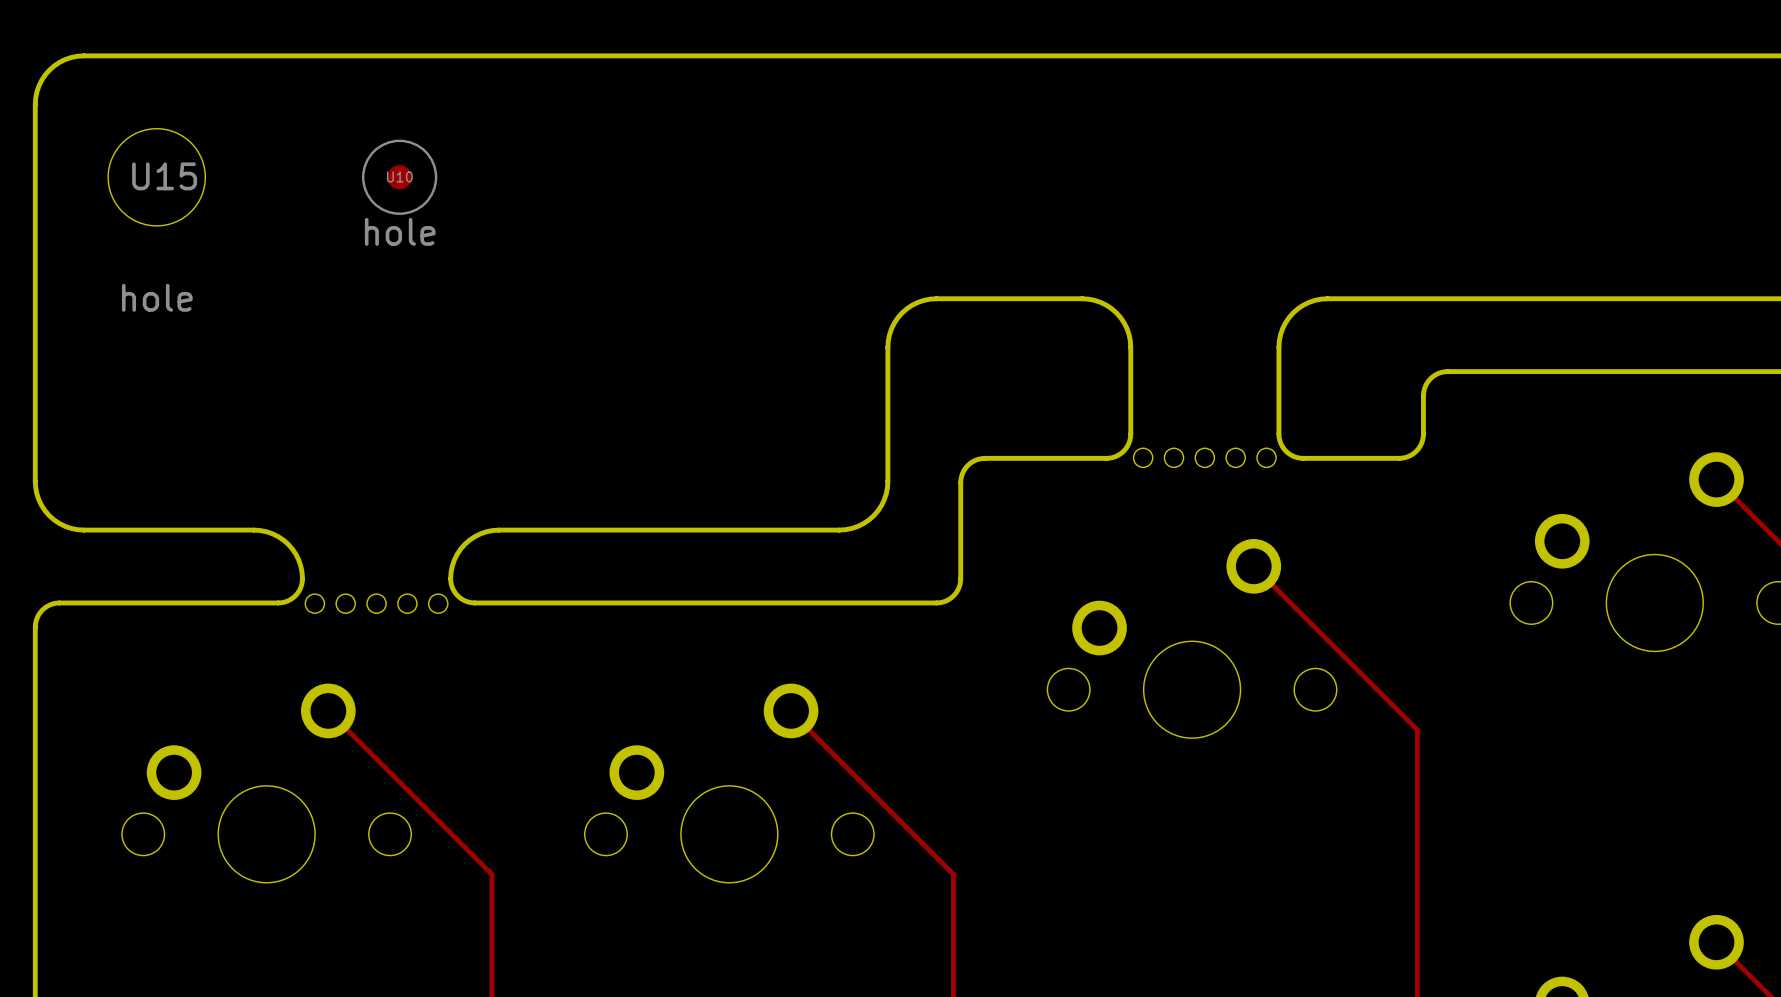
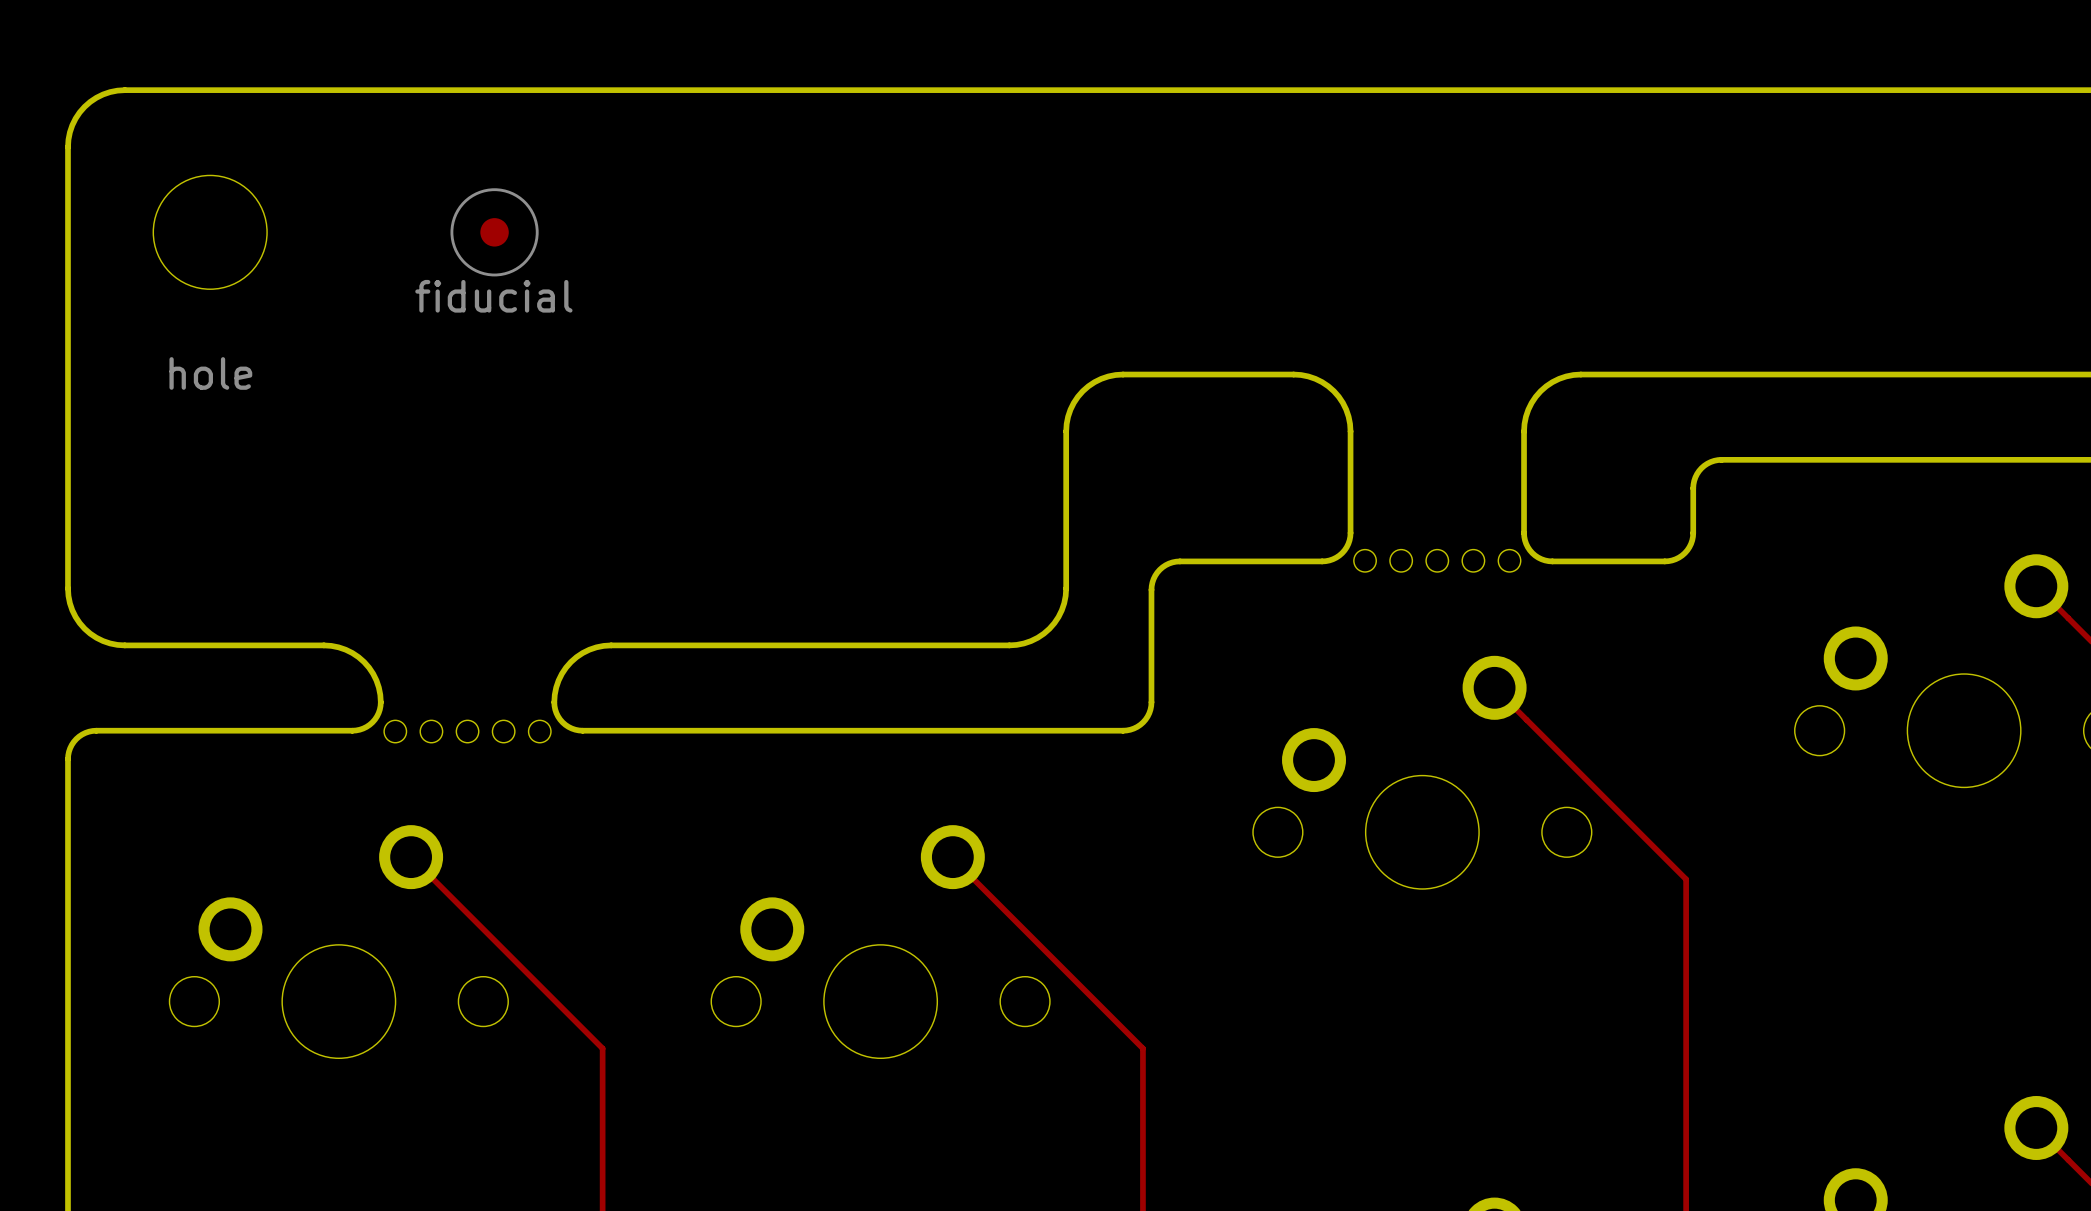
U15 name: U15 (164, 176) -> none
U10 name: U10 (399, 176) -> none
U10 value: hole (400, 231) -> fiducial (493, 296)

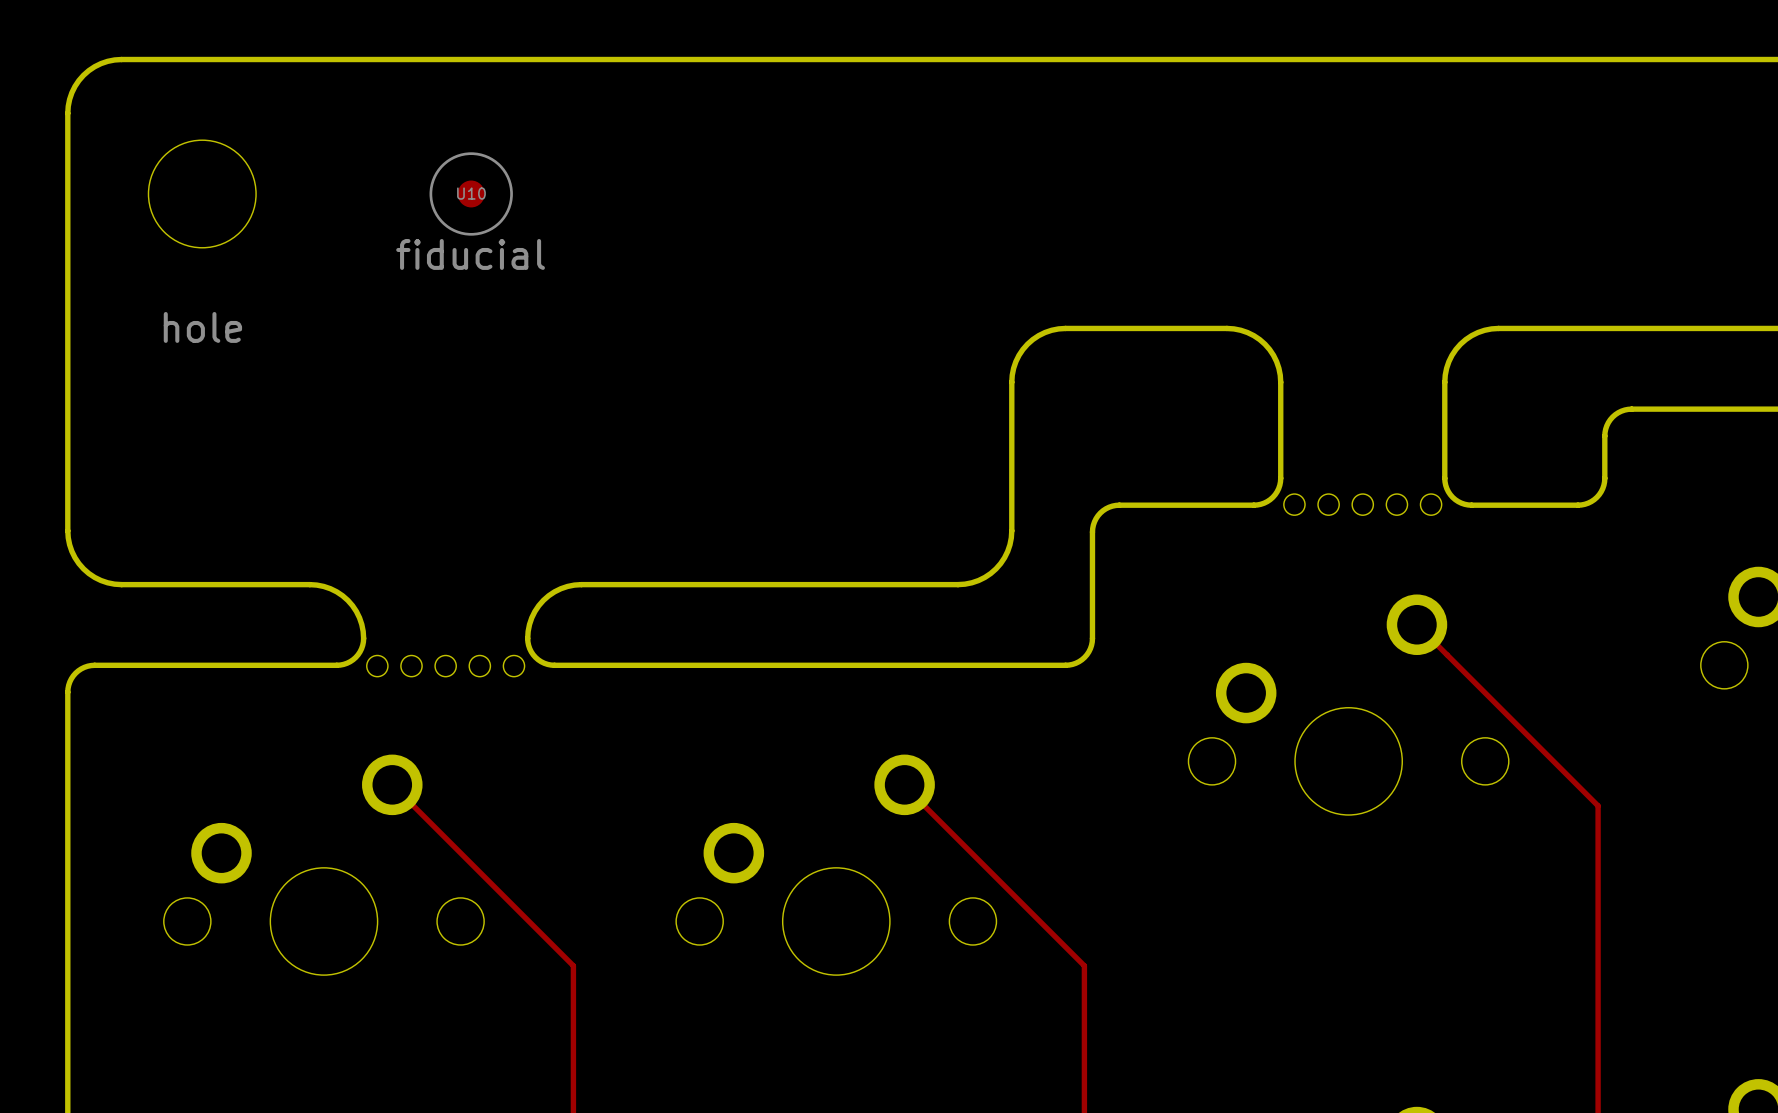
U10 name: none -> U10 (471, 193)

